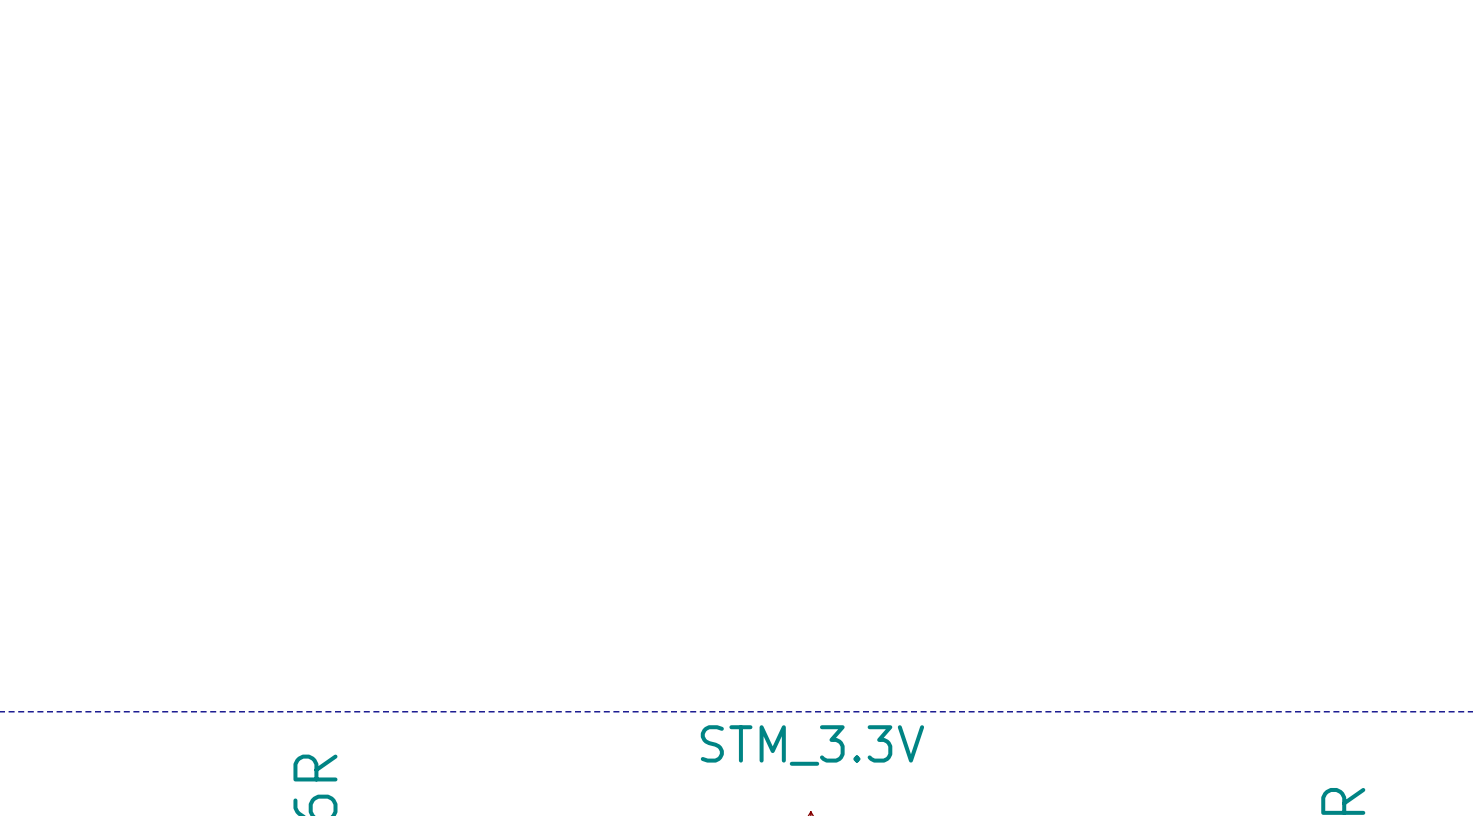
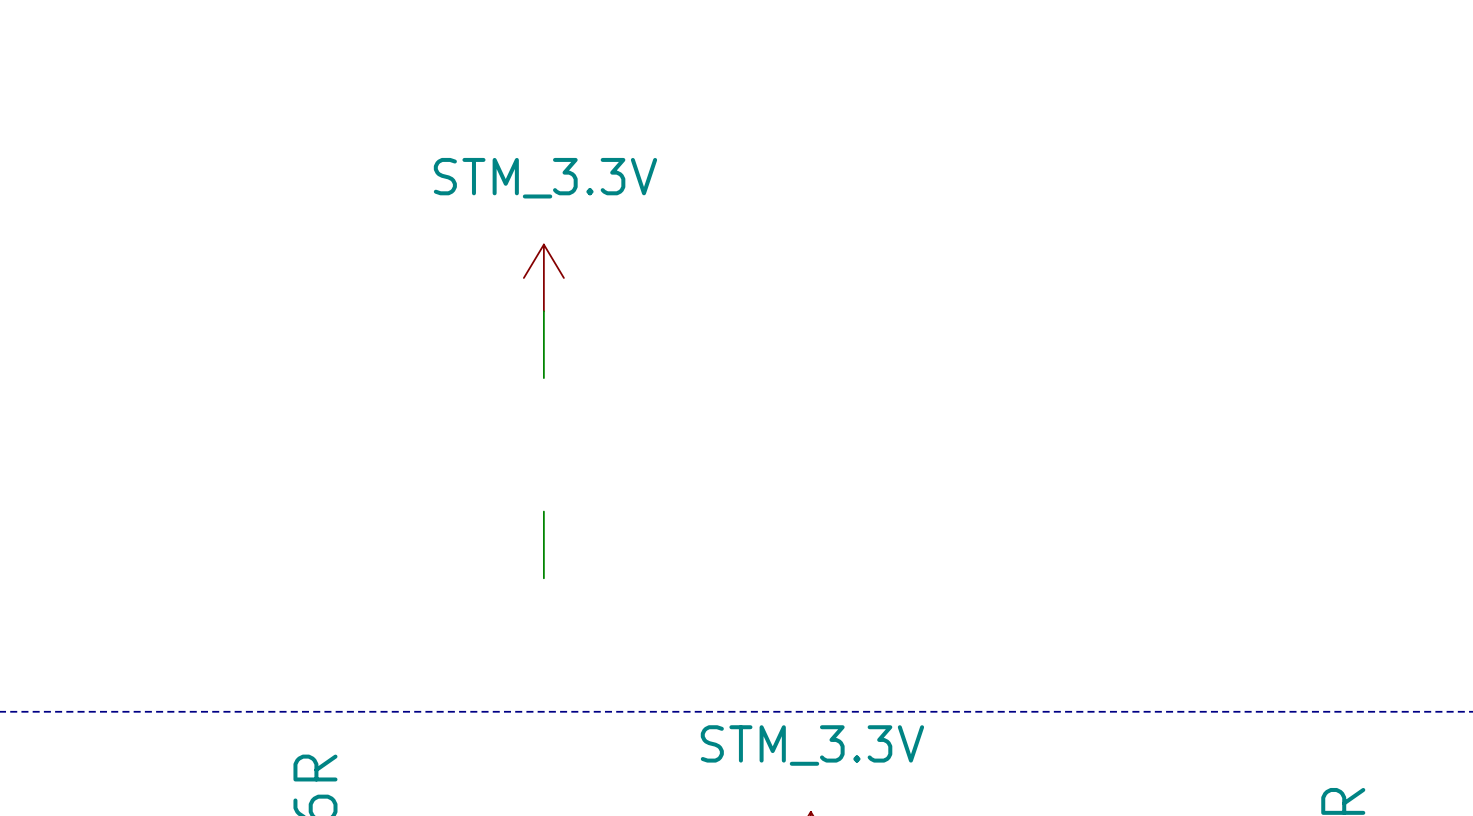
power symbol: none -> STM_3.3V (543, 277)
wire: none -> (543, 311) (543, 378)
wire: none -> (543, 511) (543, 578)

